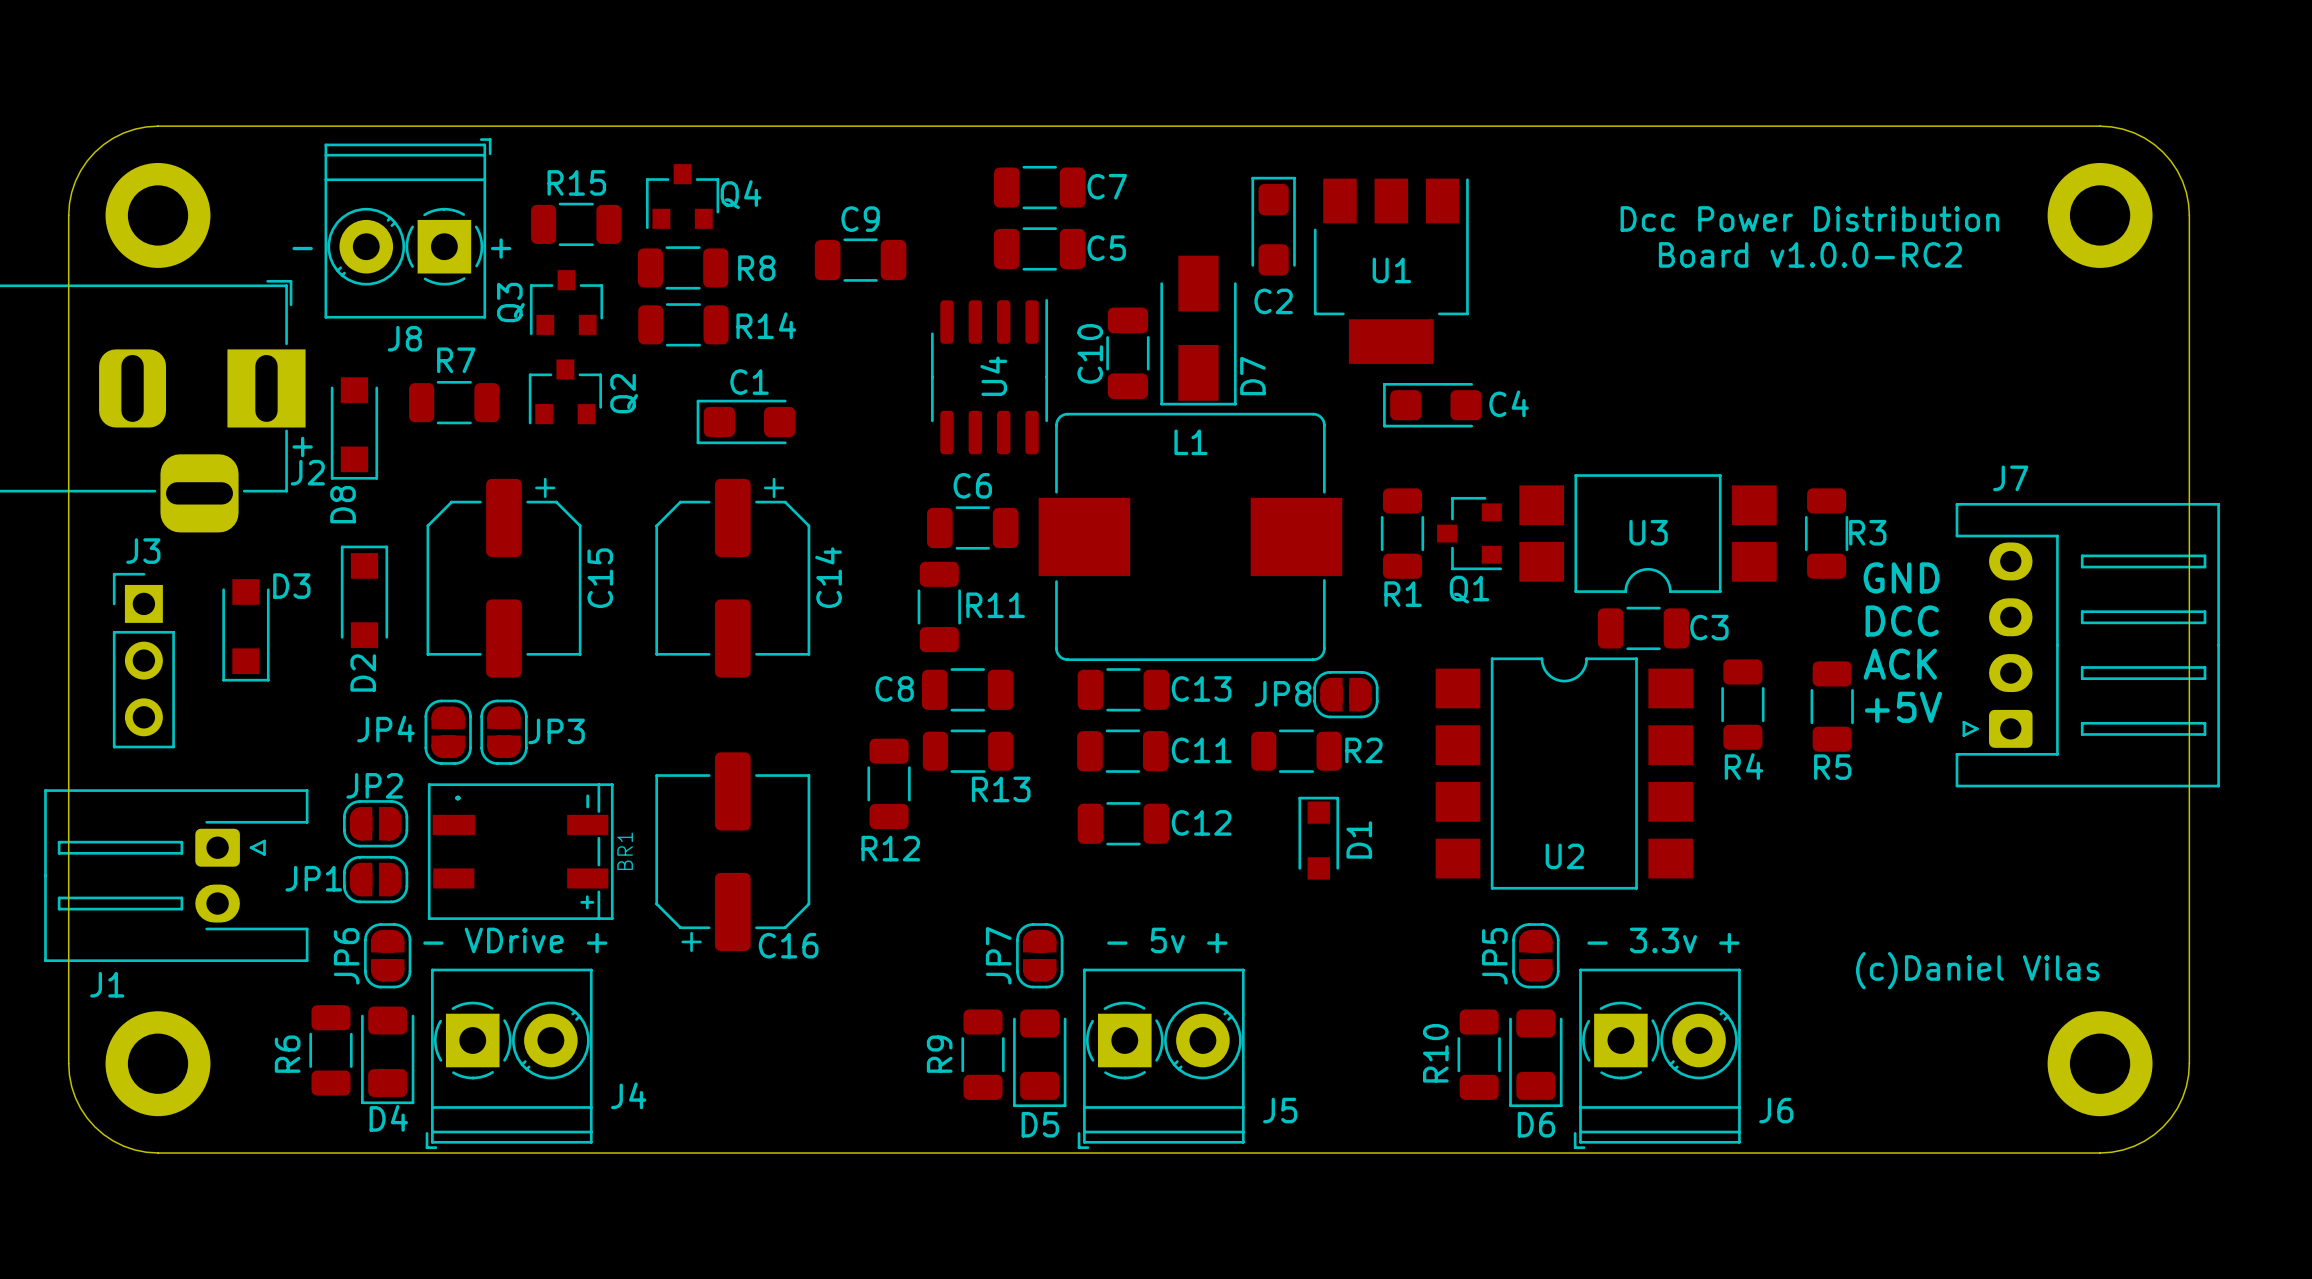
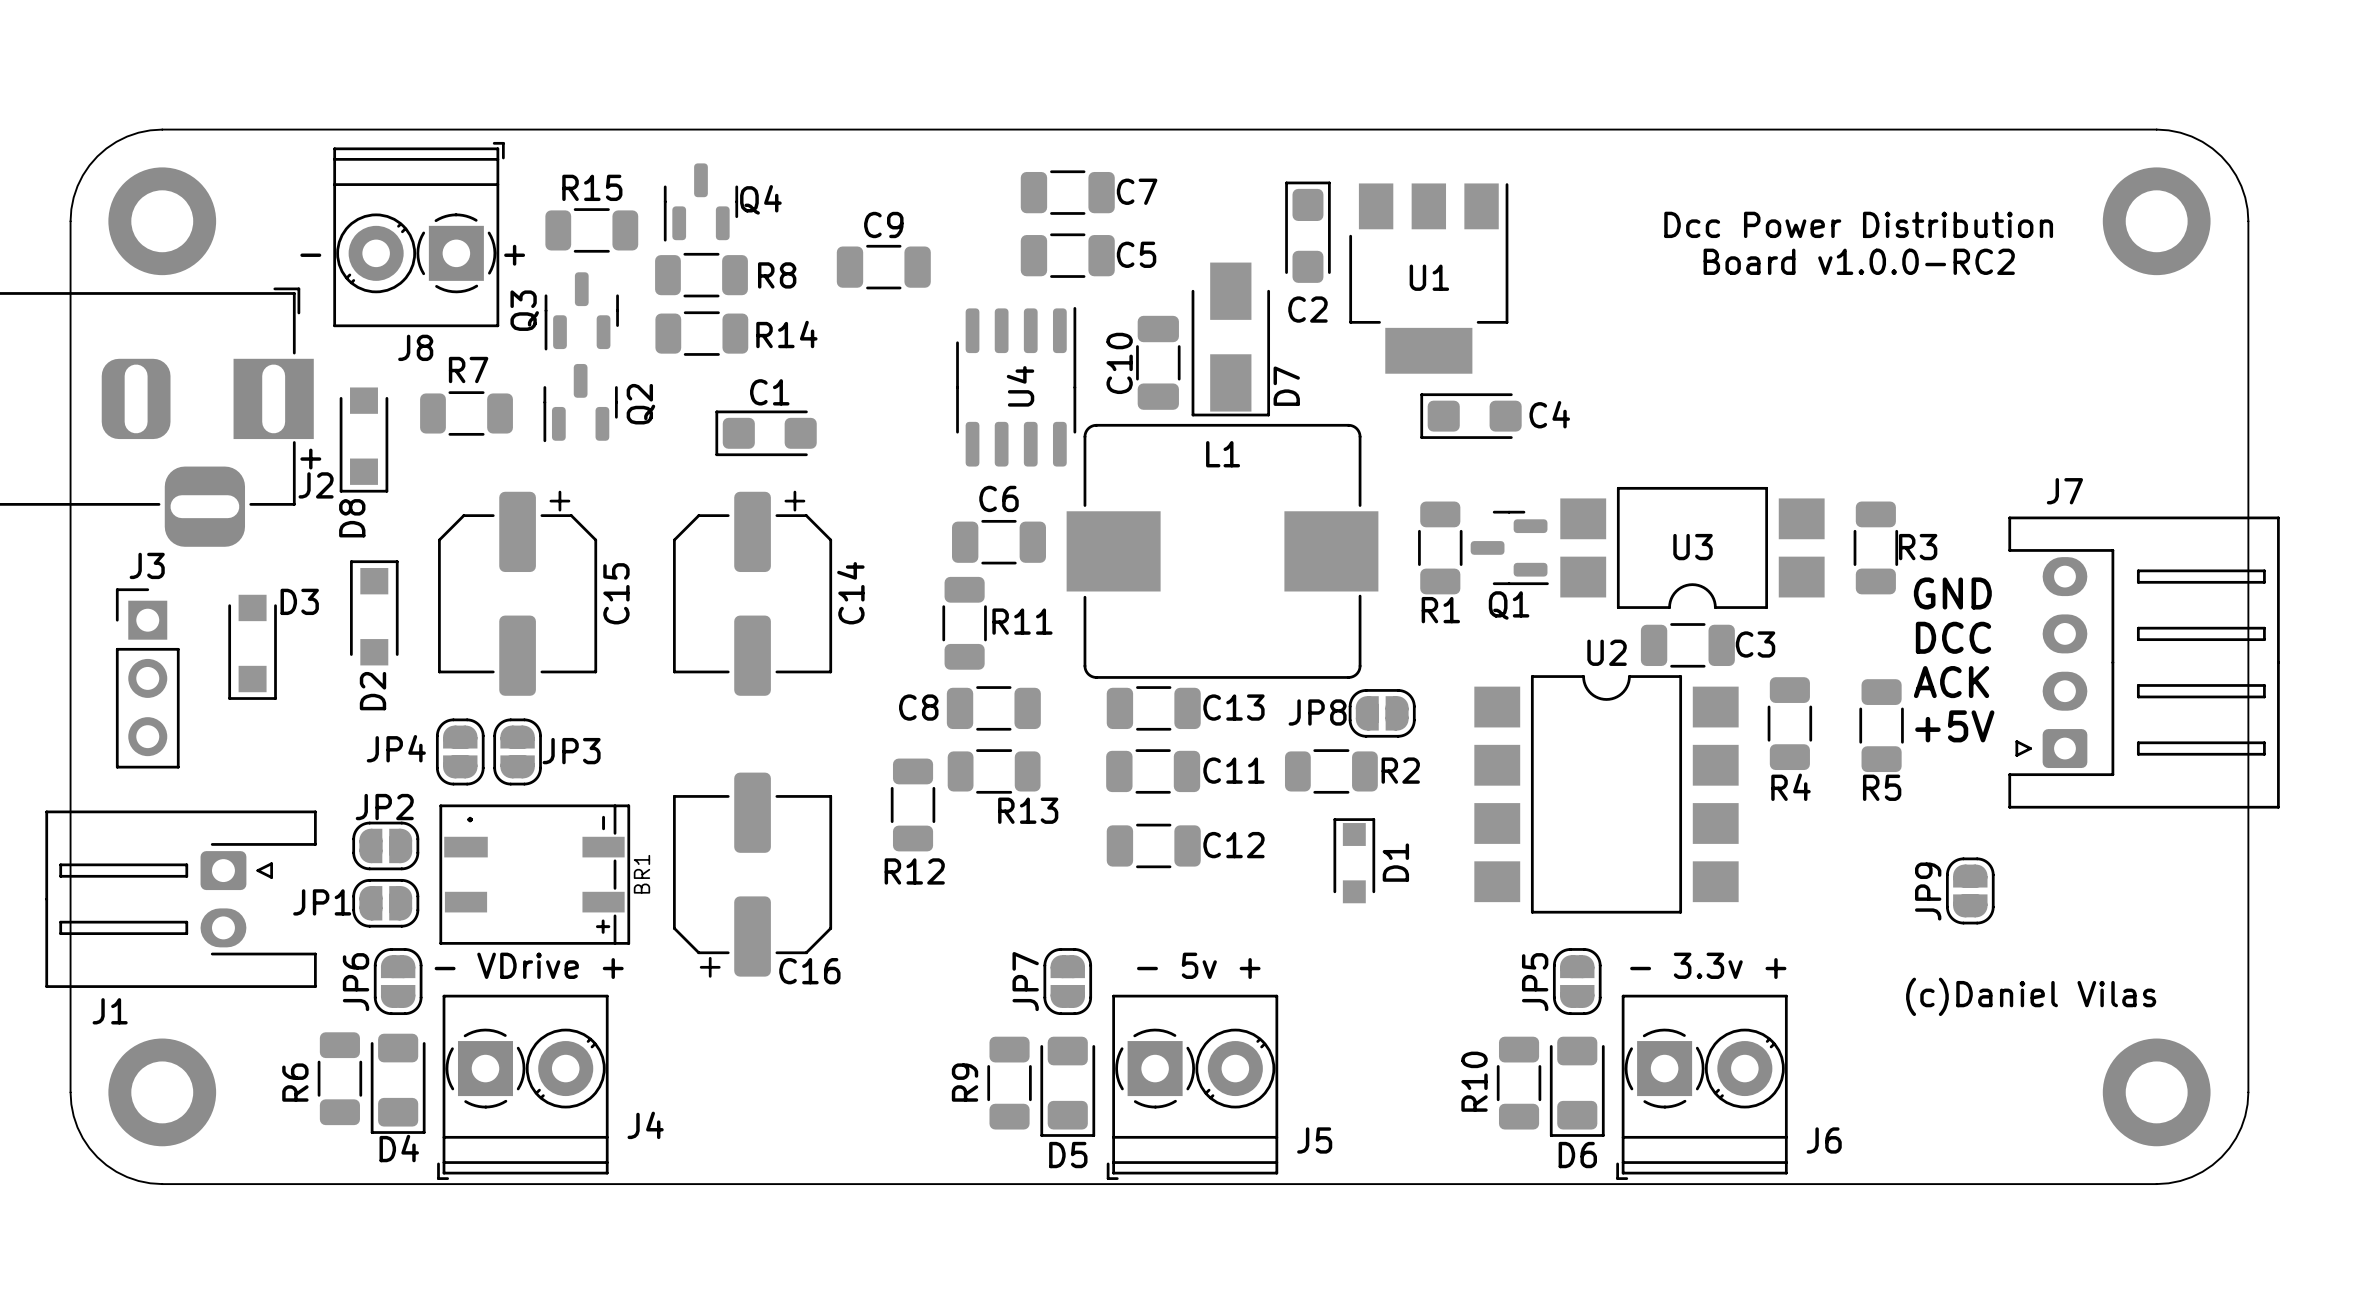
Q4 footprint: [645, 164, 720, 230] -> [663, 163, 739, 242]
Q3 footprint: [529, 270, 604, 336] -> [544, 272, 619, 351]
Q2 footprint: [528, 359, 602, 425] -> [543, 363, 618, 443]
Q1 footprint: [1437, 496, 1503, 571] -> [1470, 510, 1549, 586]
U2 name position: U2 (1564, 856) -> U2 (1607, 652)
JP9: none -> (1970, 890)

